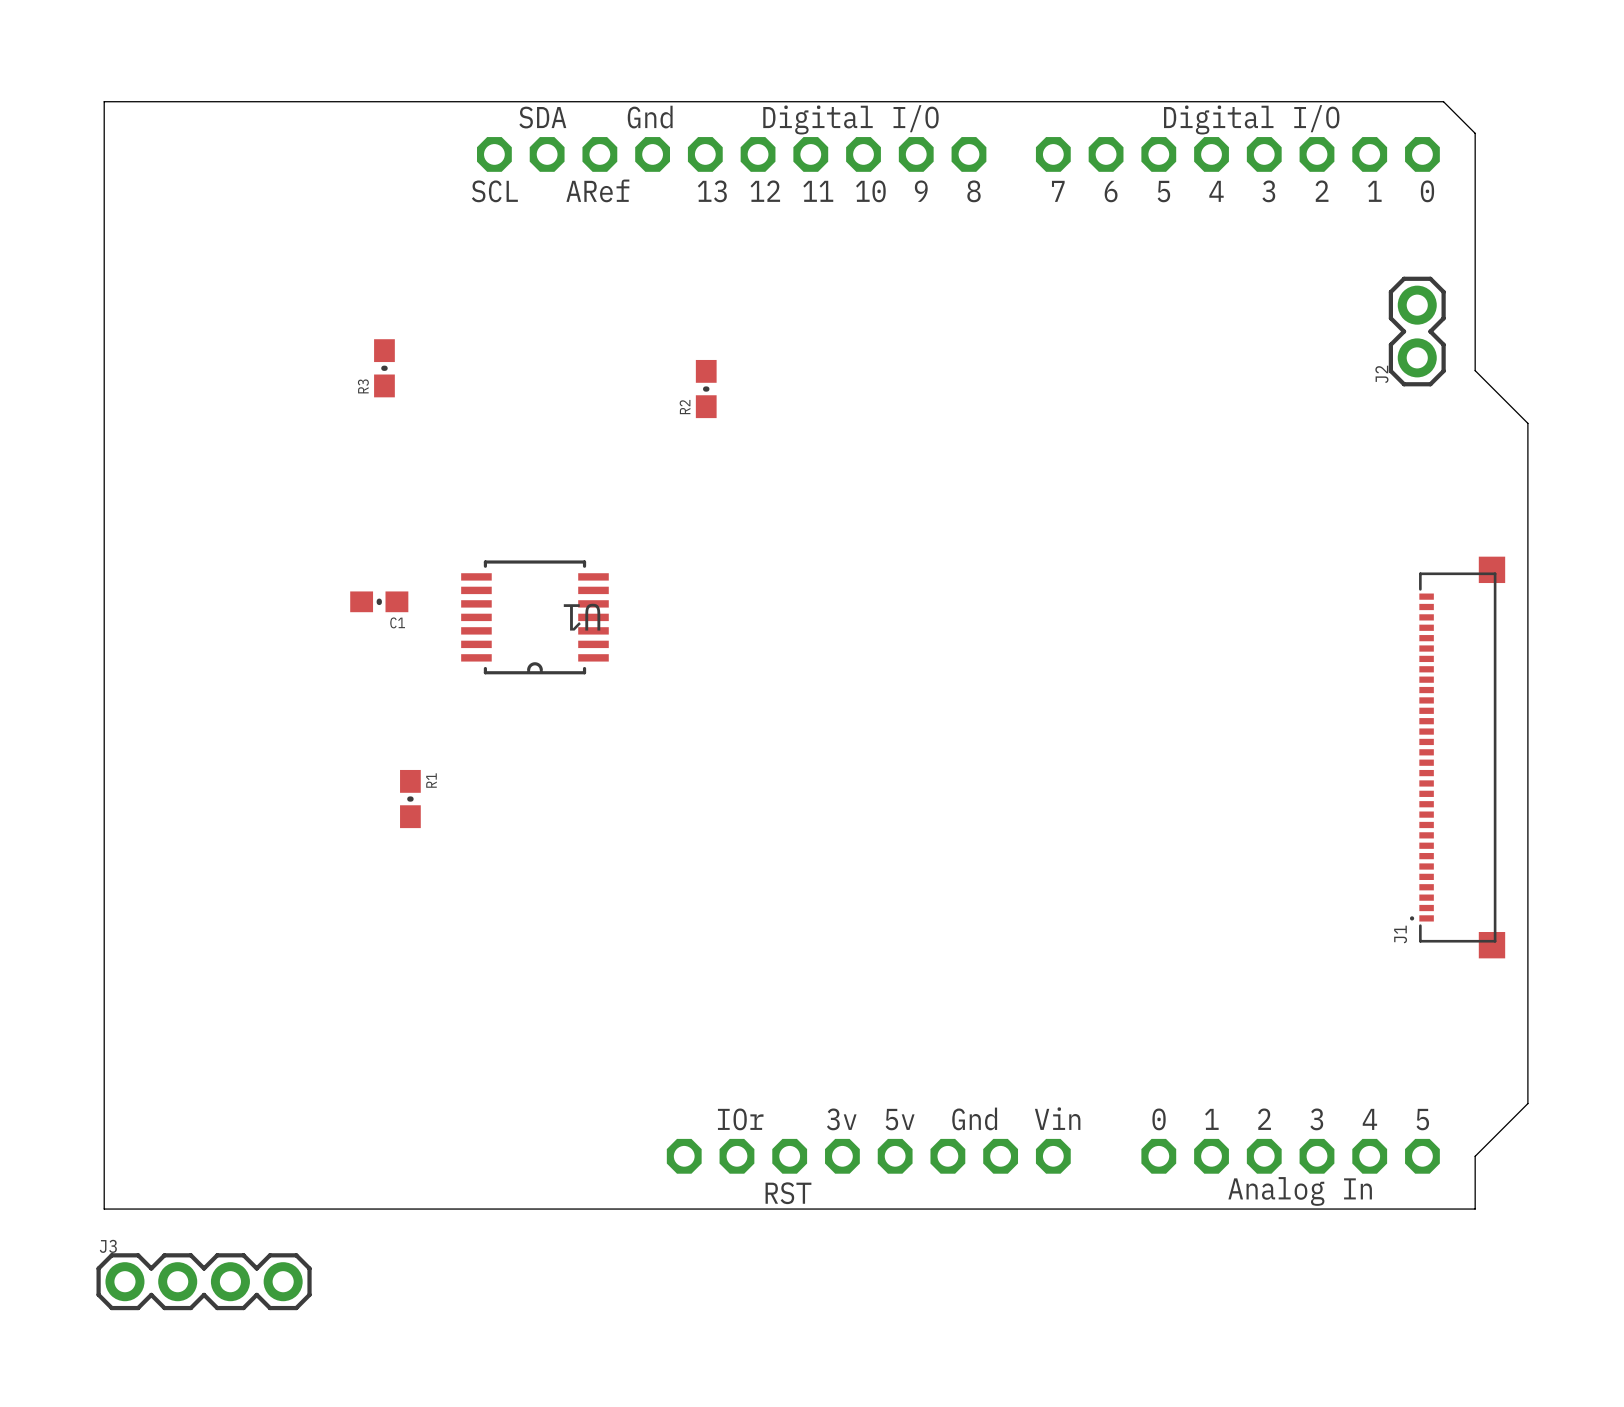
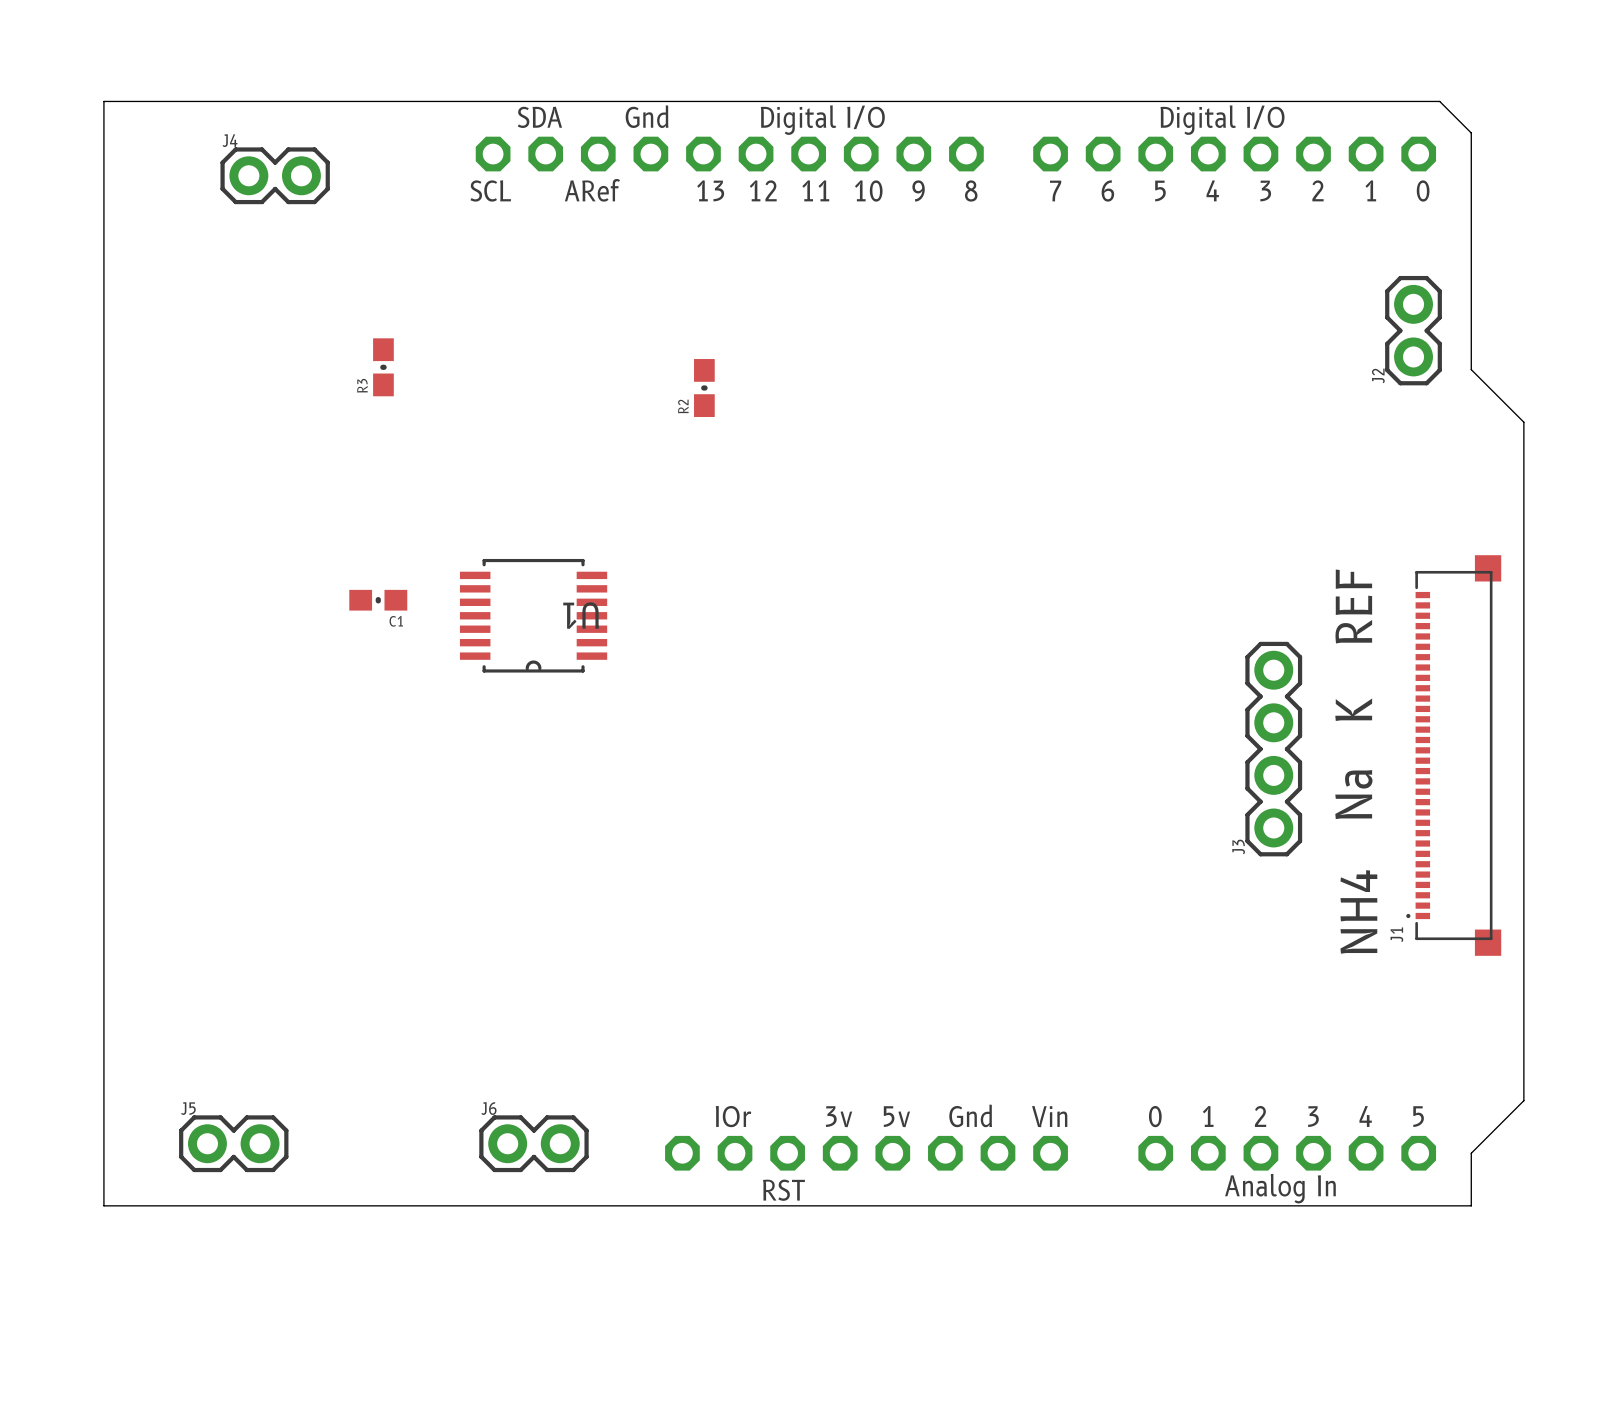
J4: none -> (275, 175)
text: none -> REF (1353, 606)
text: none -> K (1353, 709)
text: none -> Na (1353, 794)
R1: (410, 799) -> none
text: none -> NH4 (1358, 911)
J5: none -> (233, 1143)
J6: none -> (533, 1143)
J3 name position: J3 (108, 1246) -> J3 (1238, 846)
J3 rotation: 0° (204, 1281) -> 90° clockwise (1273, 749)
J3 position: (204, 1281) -> (1273, 749)

